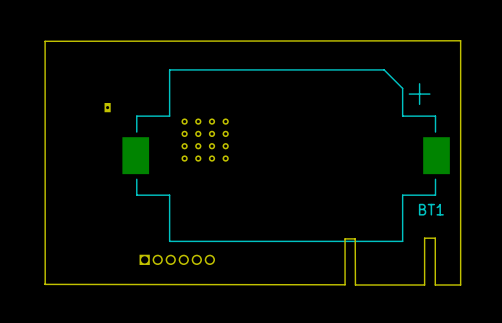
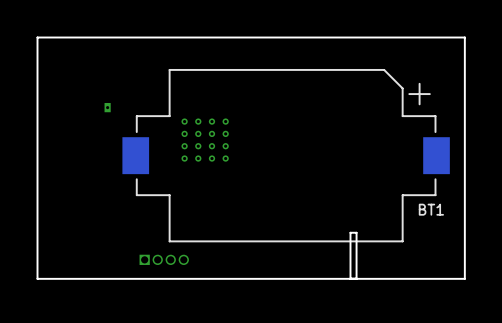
board edge: (460, 40) (45, 41) (45, 284) (345, 284) (345, 238) (355, 238) (355, 285) (424, 285) (424, 238) (435, 238) (435, 285) (460, 285) (460, 40) -> (464, 37) (464, 278) (37, 278) (37, 37) (464, 37)
board edge: none -> (356, 232) (350, 232) (350, 278) (356, 278) (356, 232)
part: (177, 259) -> none

